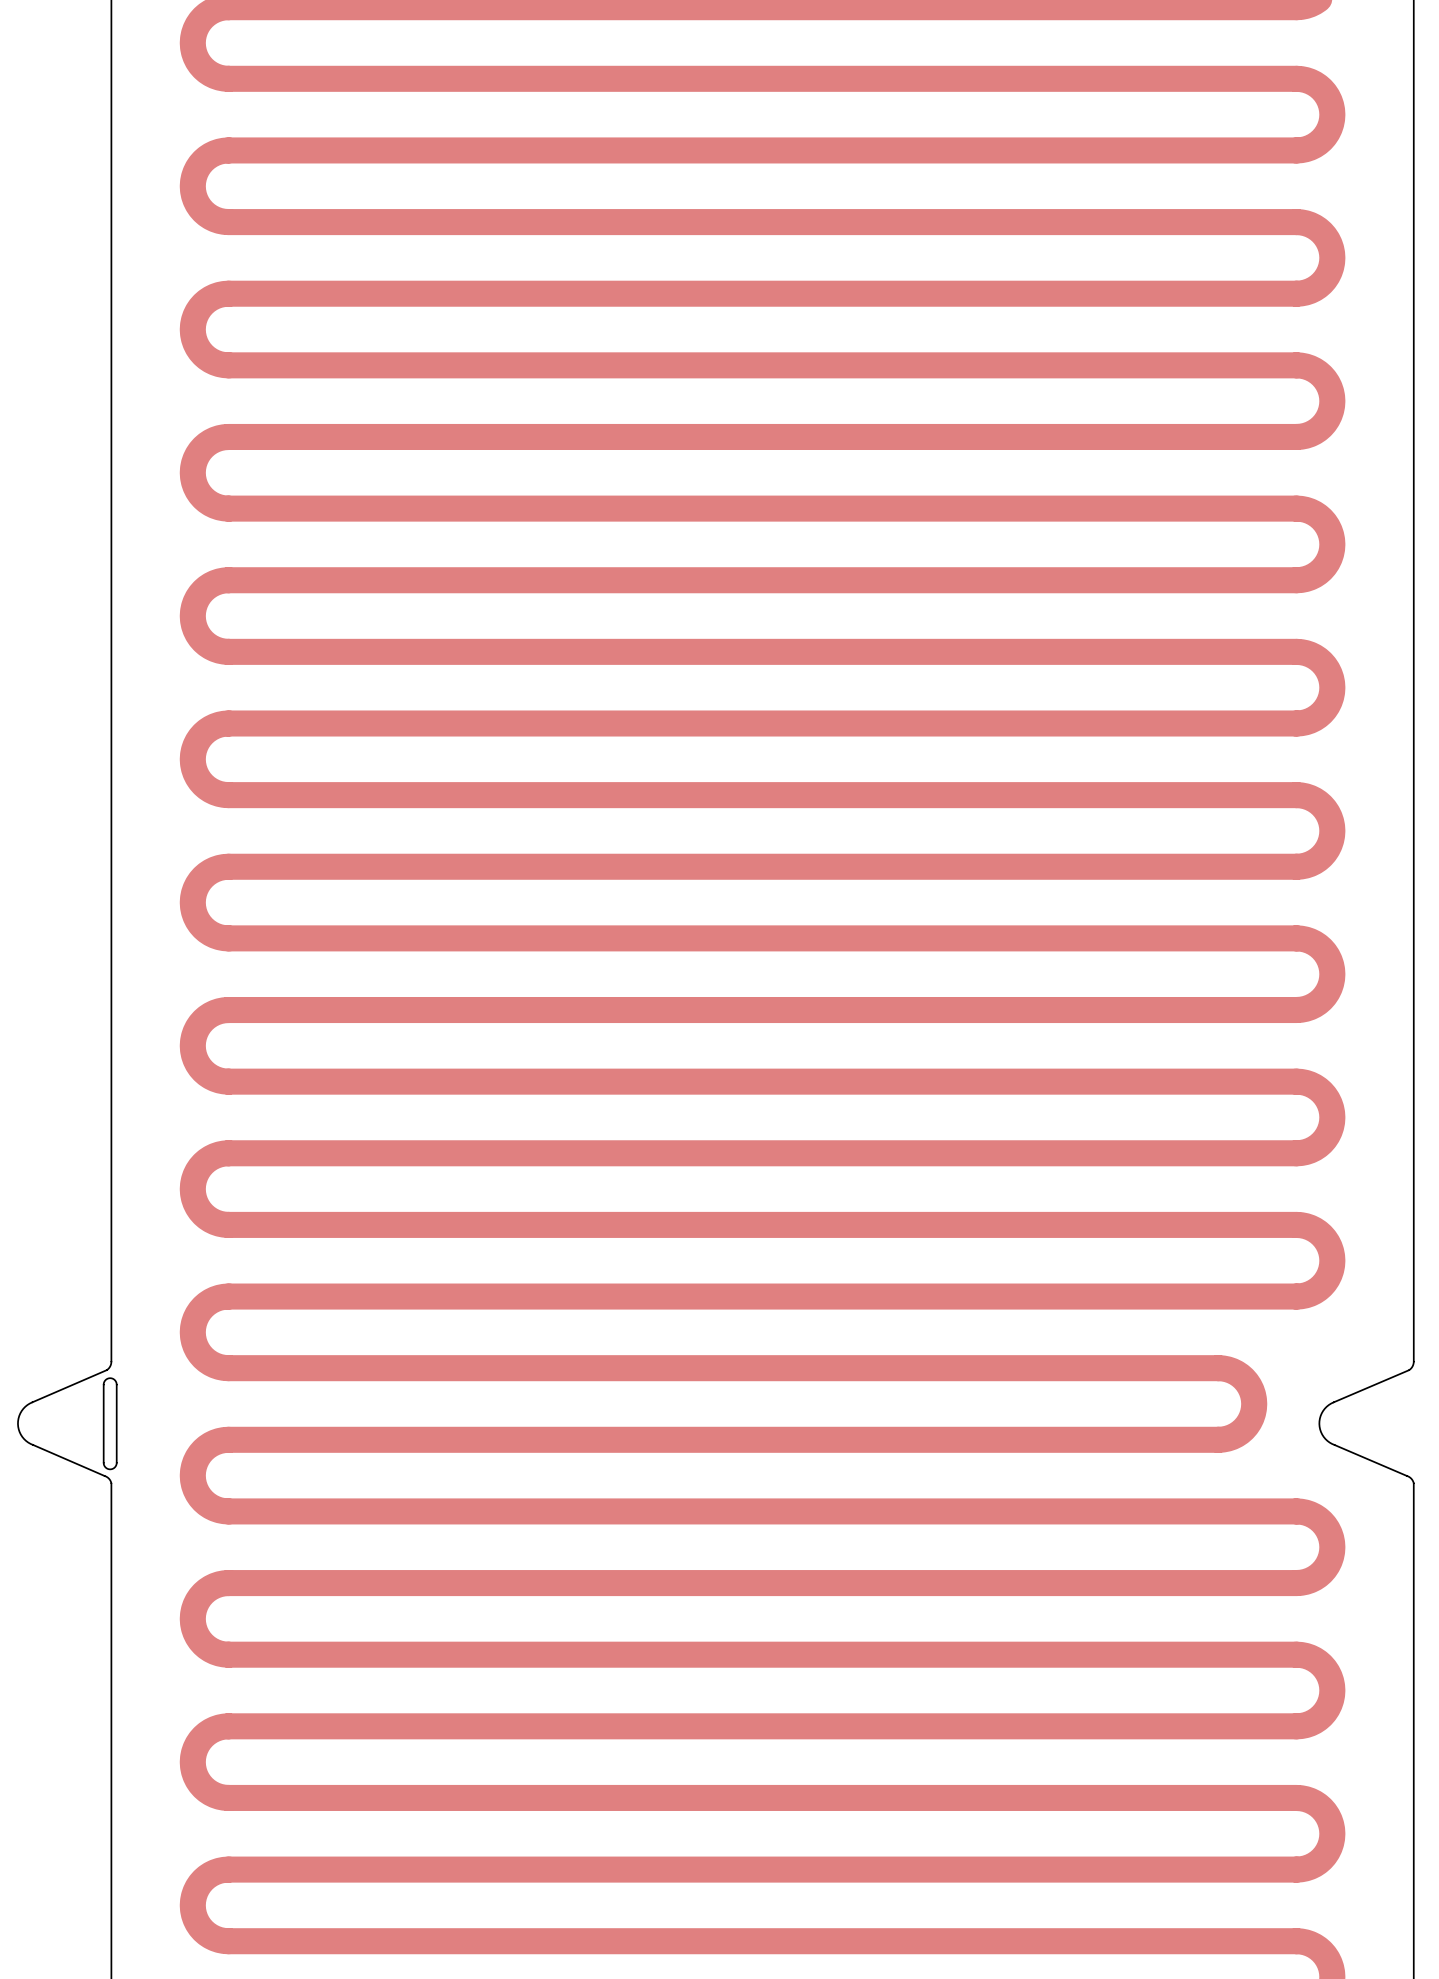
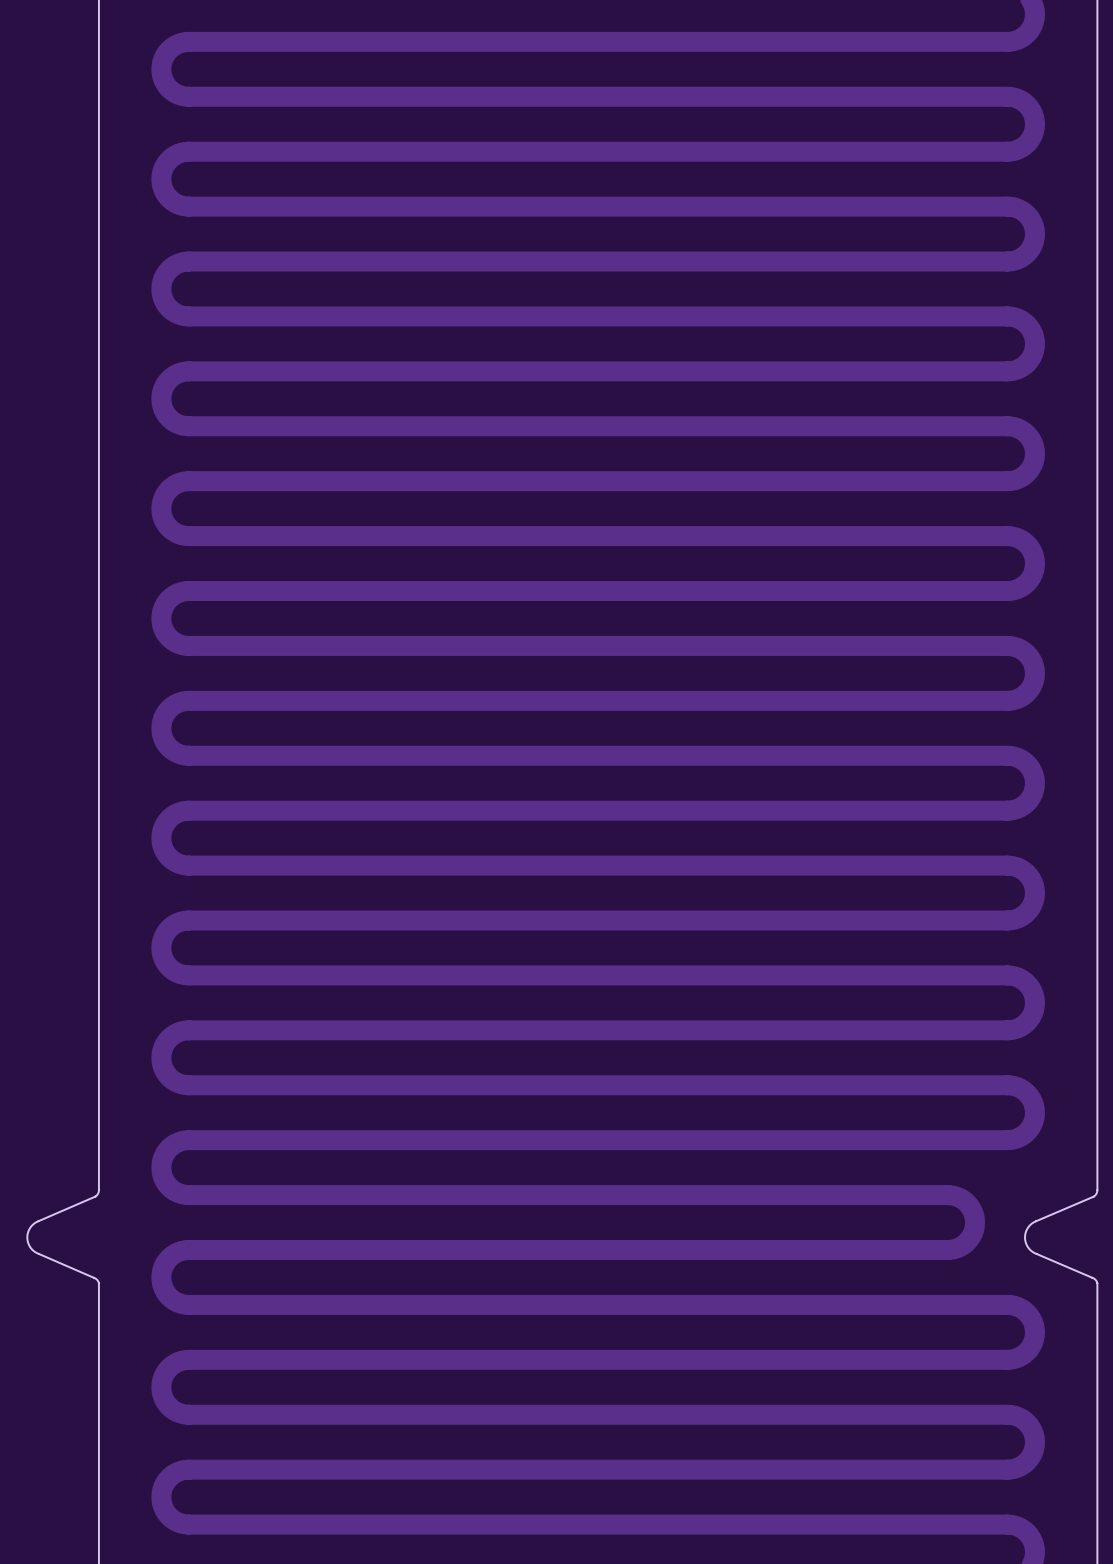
board edge: (103, 1384) (103, 1463) (105, 1467) (110, 1469) (116, 1463) (116, 1383) (114, 1379) (110, 1378) (105, 1379) (103, 1384) -> none

